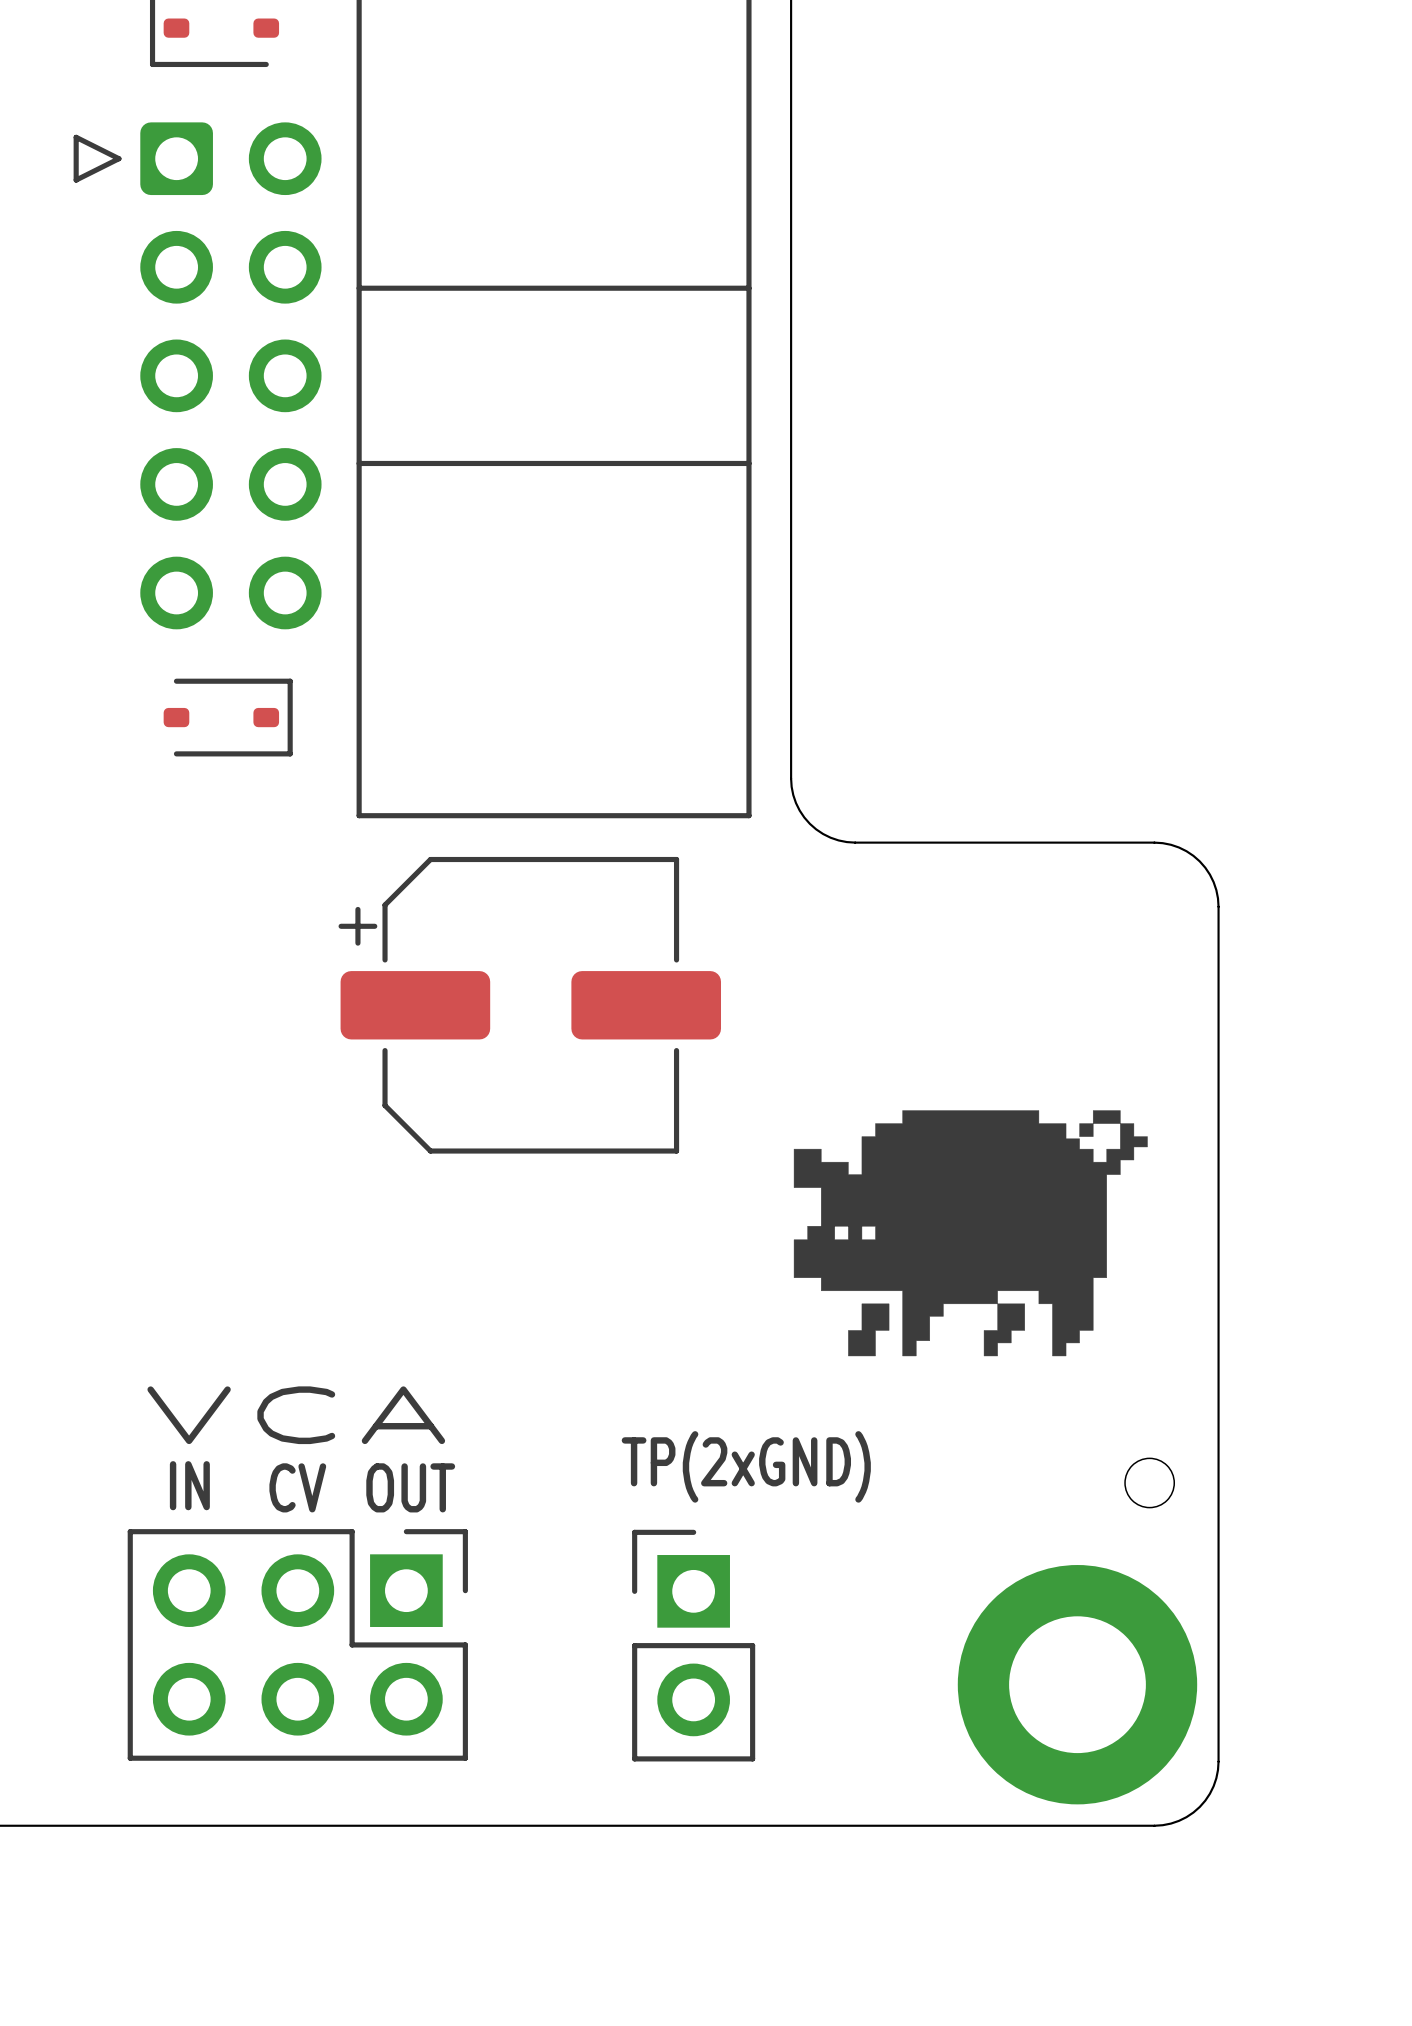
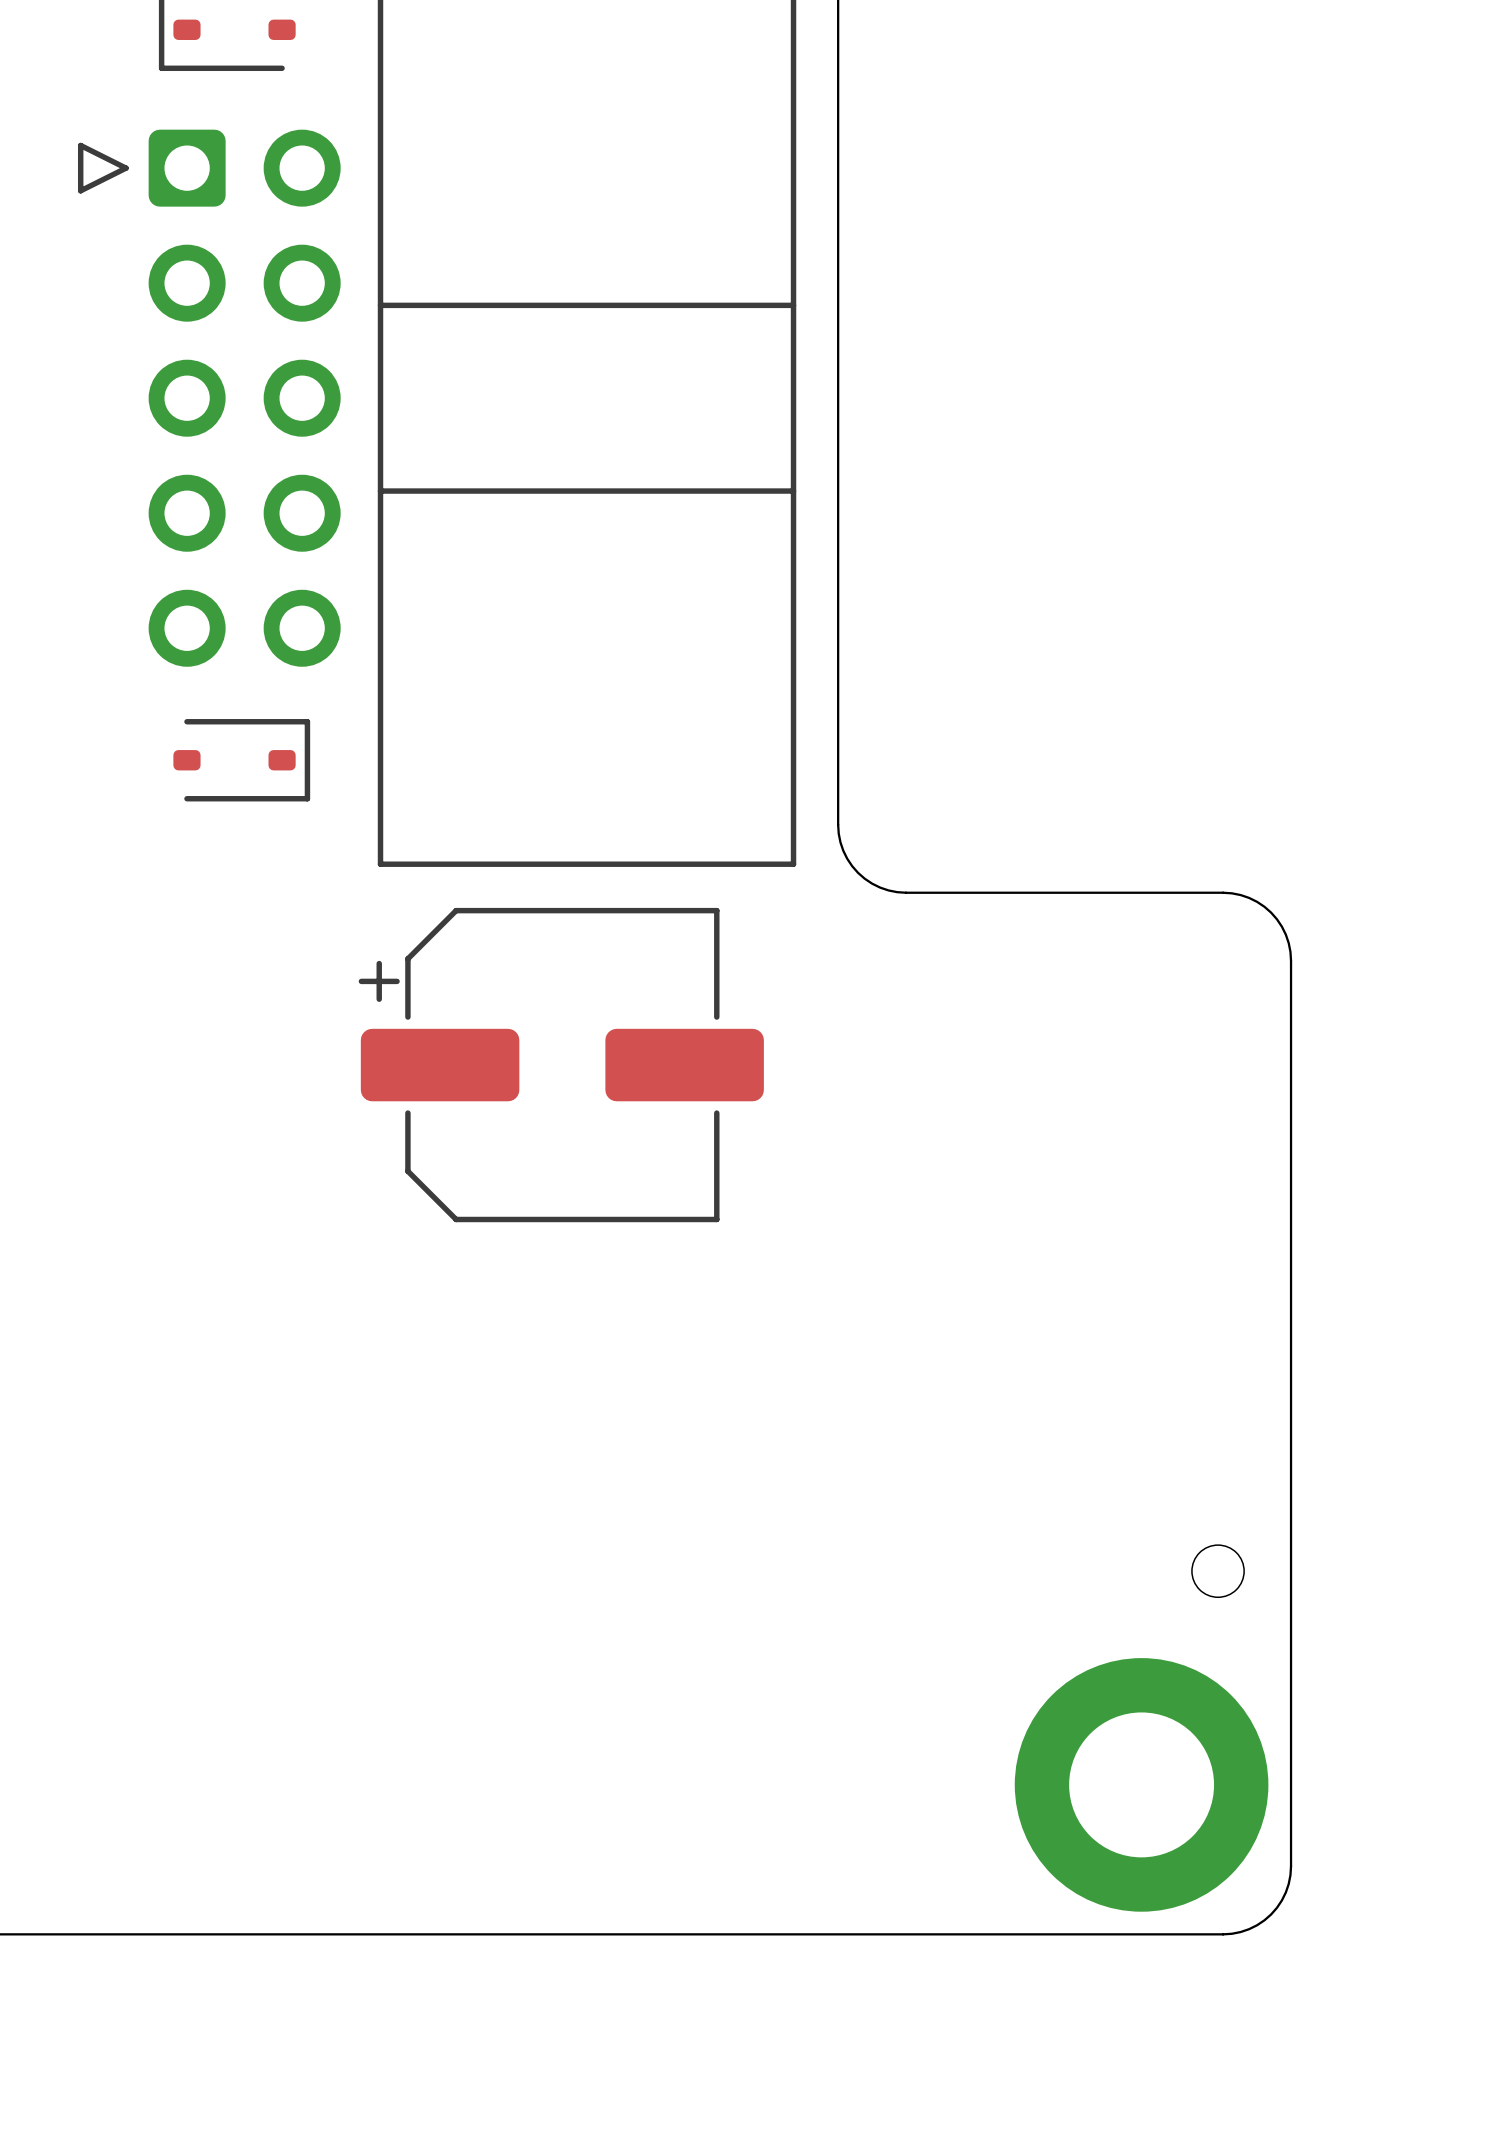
drawing: [793, 1110, 1148, 1357] -> none
text: VCA (296, 1415) -> none
text: TP(2xGND) (746, 1466) -> none
text: IN (189, 1485) -> none
text: CV (297, 1487) -> none
text: OUT (410, 1487) -> none
part: (297, 1644) -> none
part: (693, 1645) -> none

